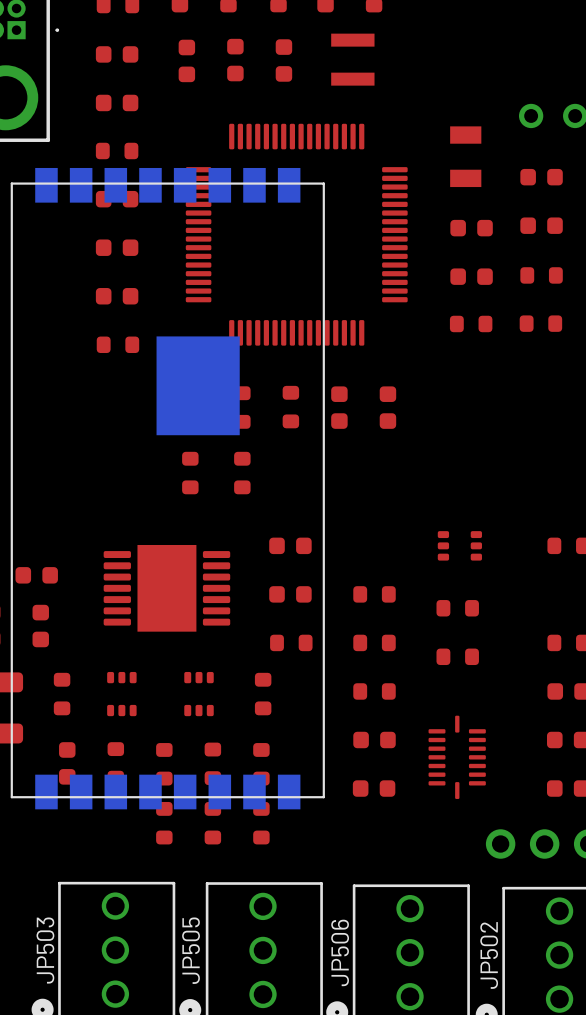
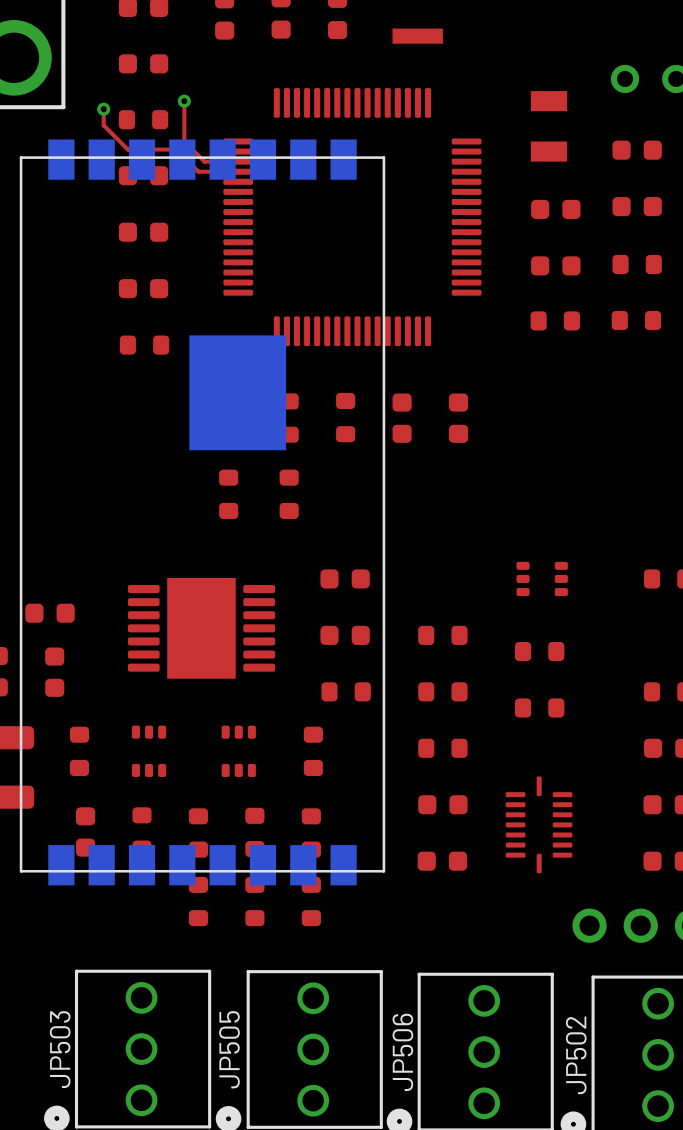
top track: none -> (184, 101) (184, 141) (204, 161) (238, 161)
via: none -> (184, 101)
top track: none -> (103, 109) (103, 125) (127, 149) (176, 149) (198, 171) (238, 171)
via: none -> (103, 109)

